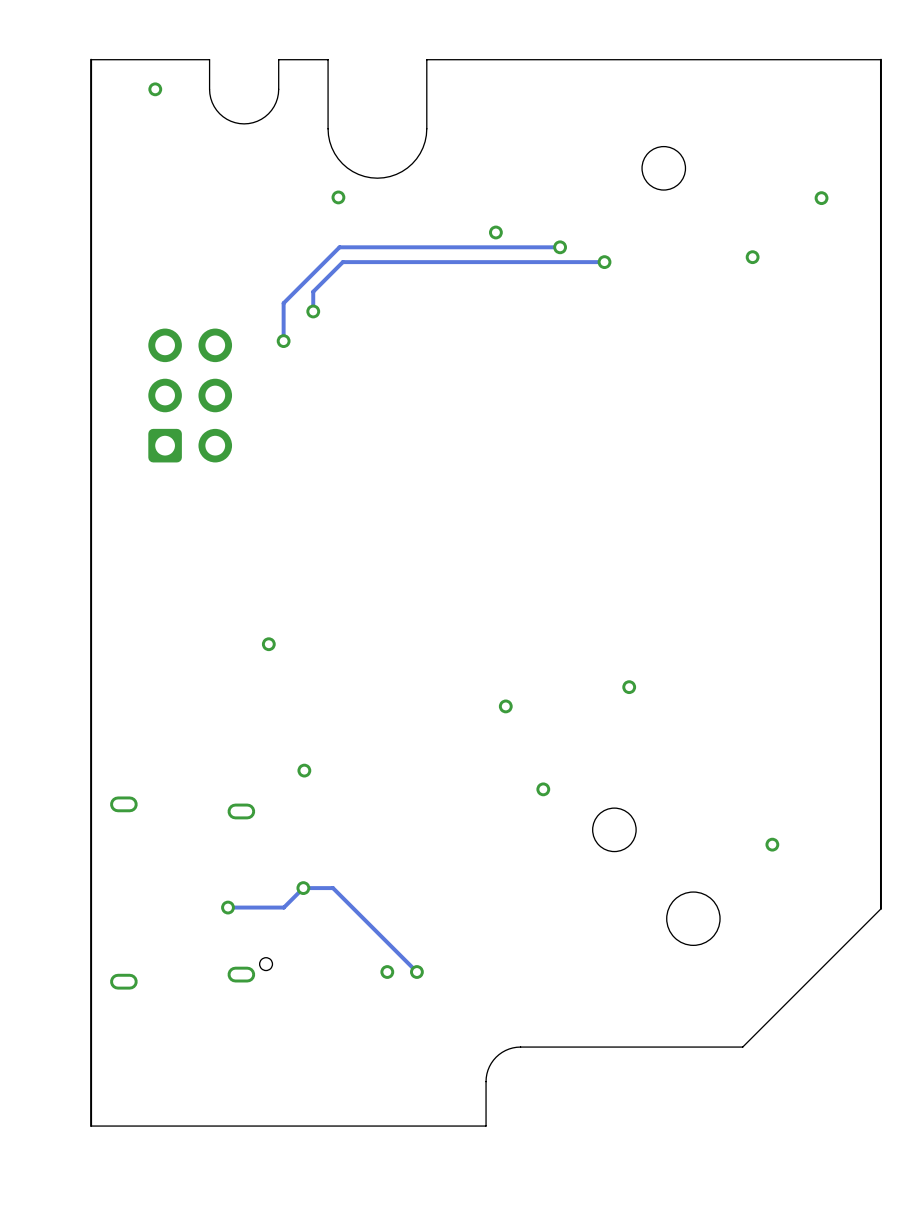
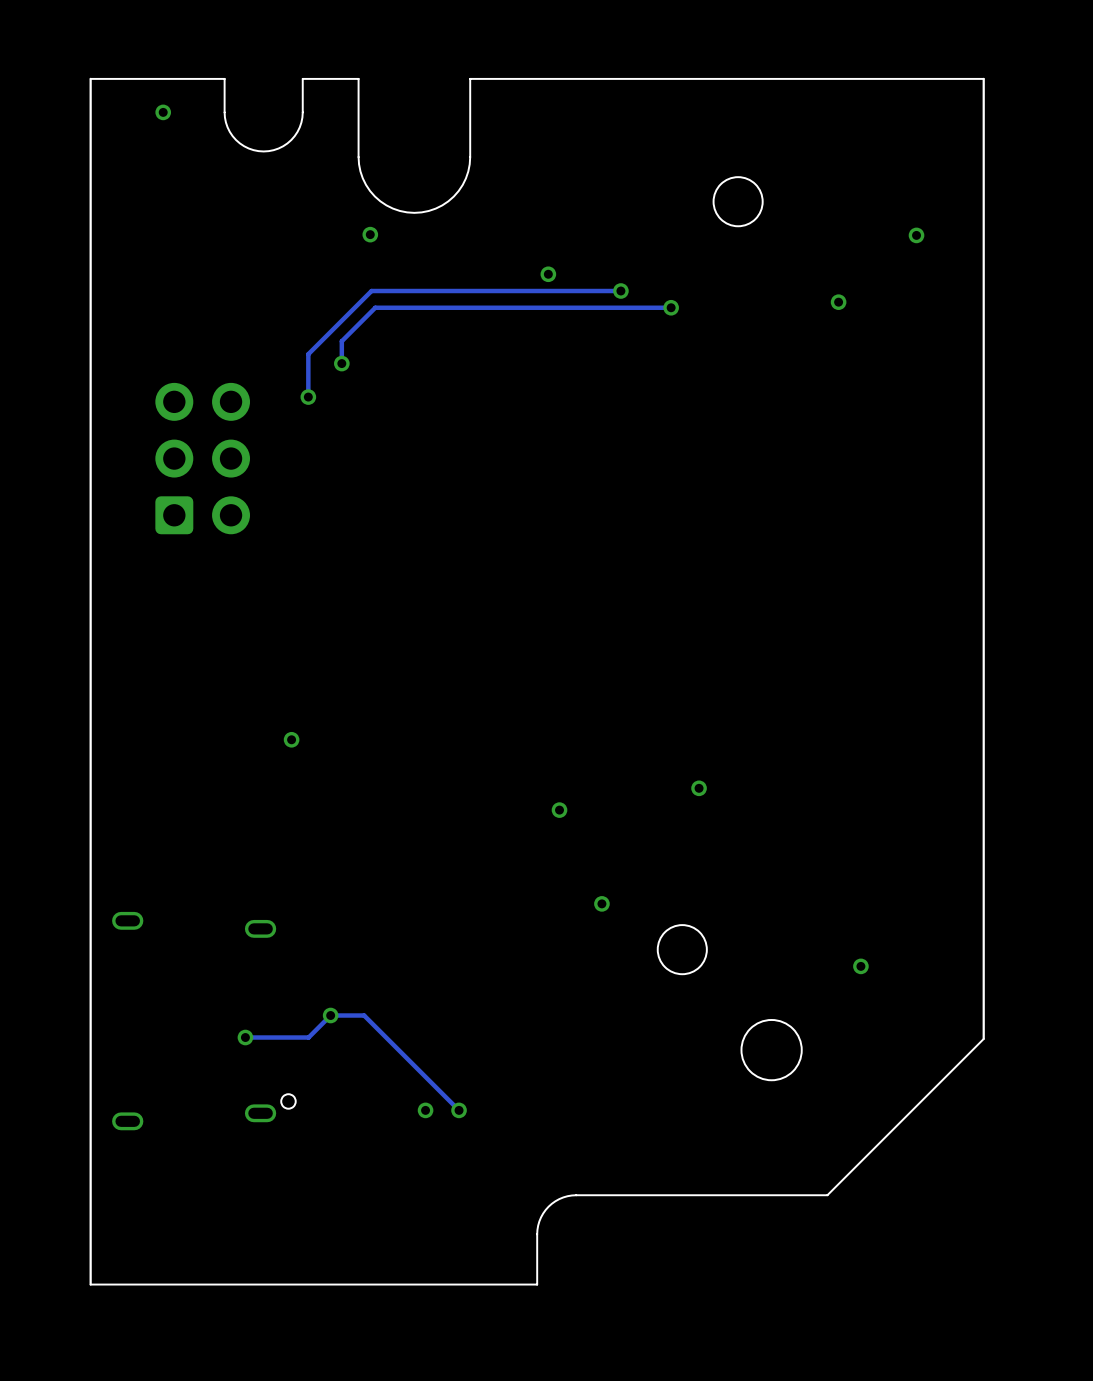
via: (304, 770) -> none

